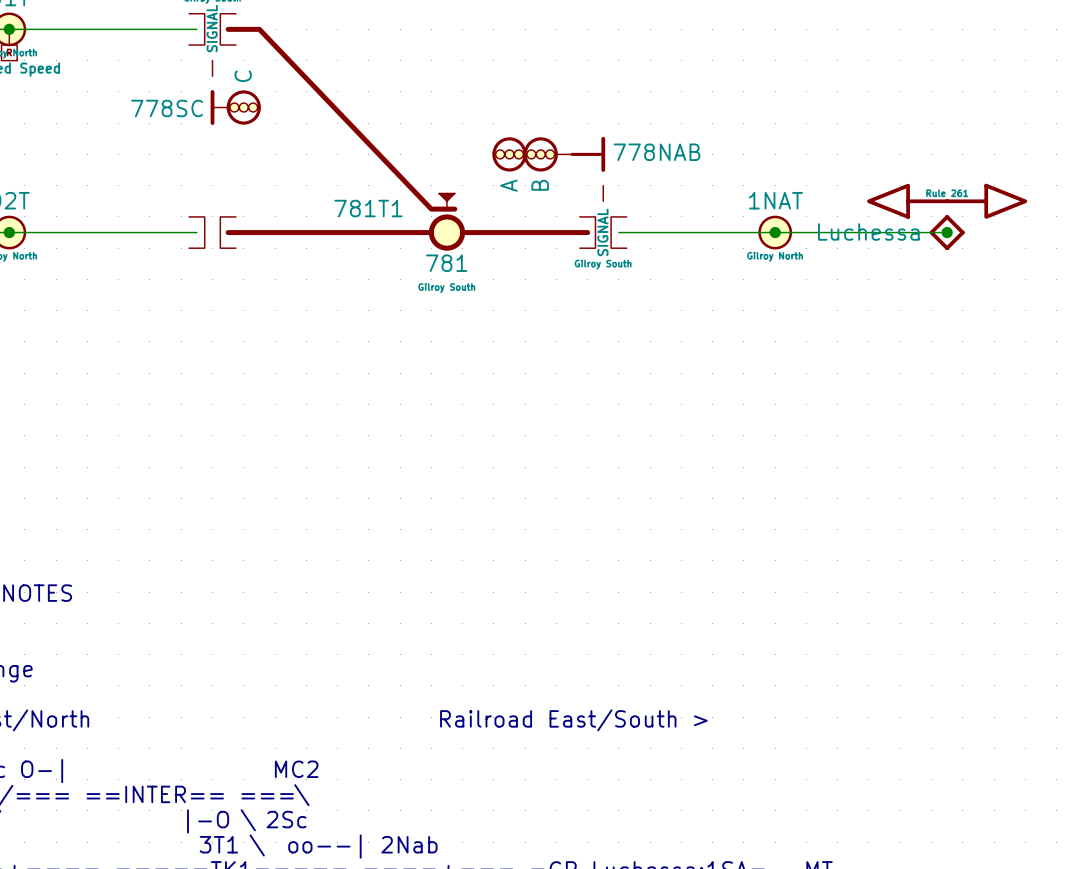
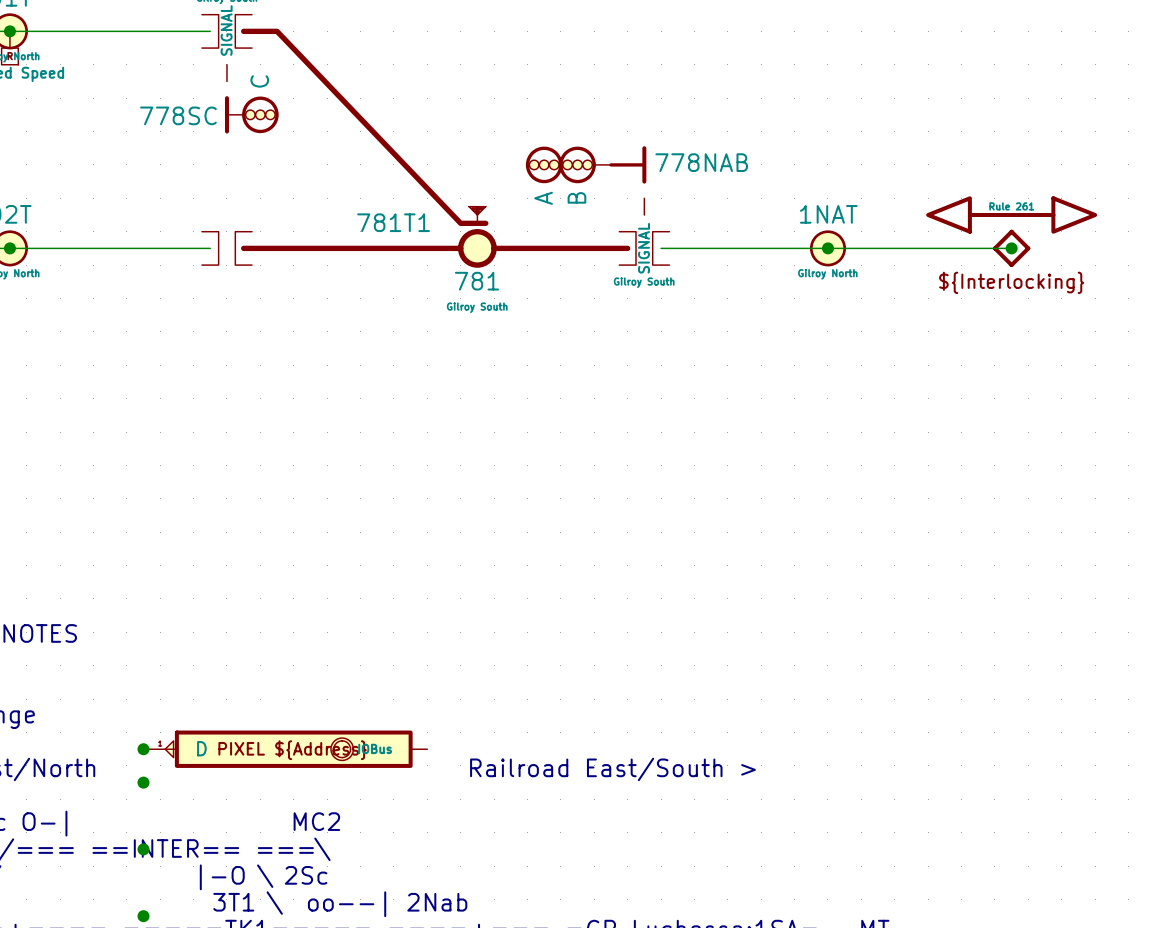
part value: Luchessa (868, 231) -> none
part text: none -> ${Interlocking} (1011, 282)
junction: none -> (143, 749)
part: none -> (285, 749)
junction: none -> (143, 782)
junction: none -> (143, 849)
junction: none -> (143, 916)

